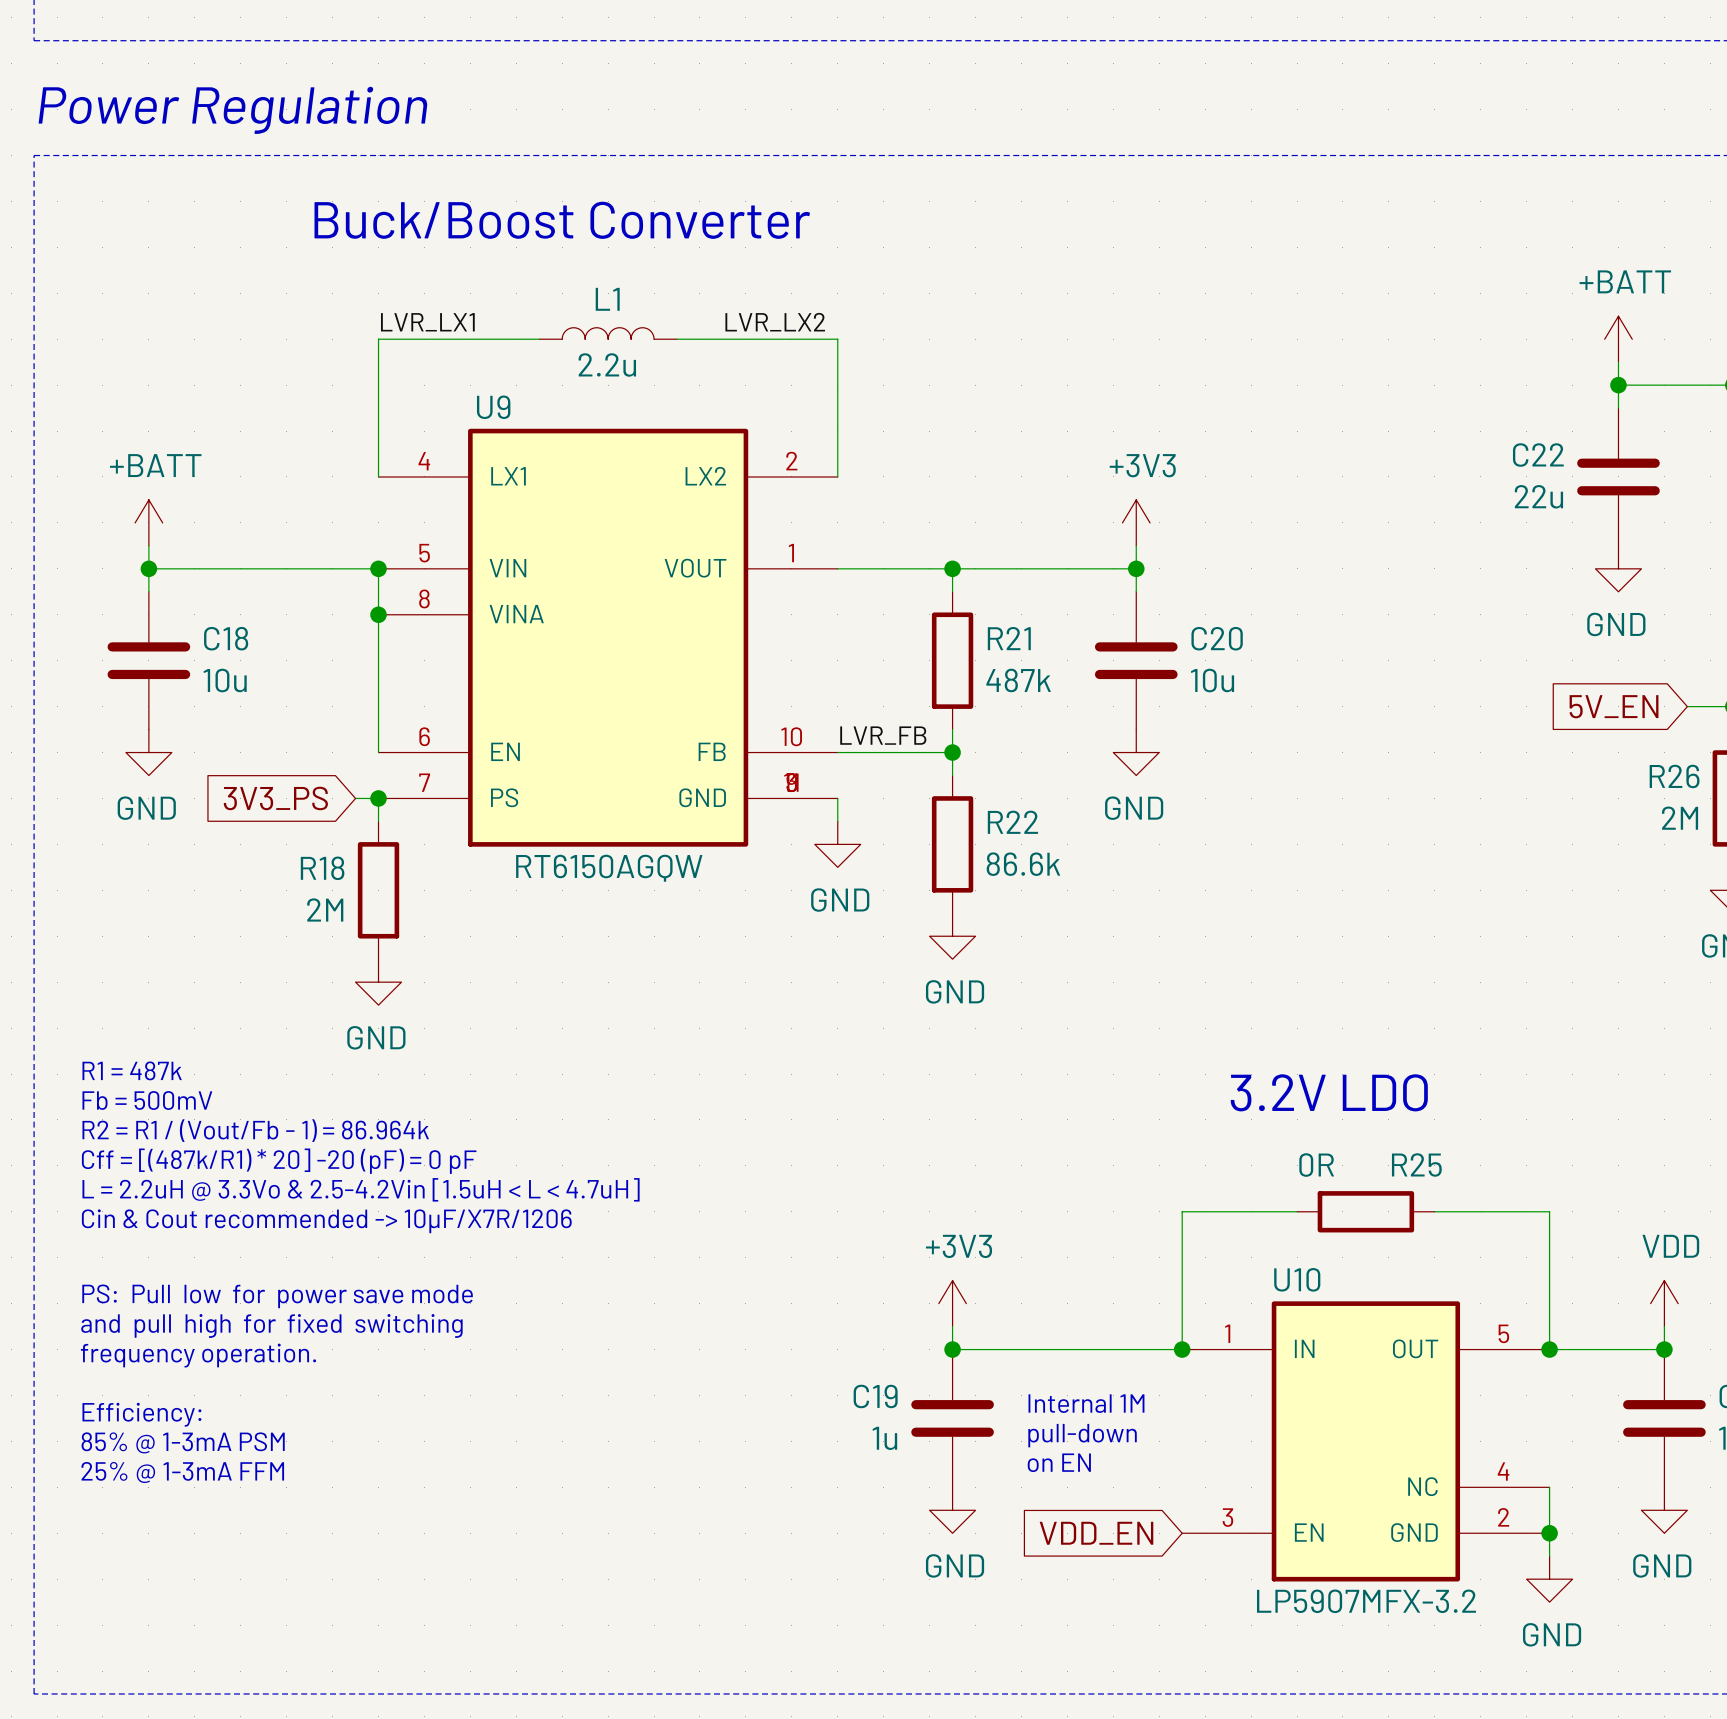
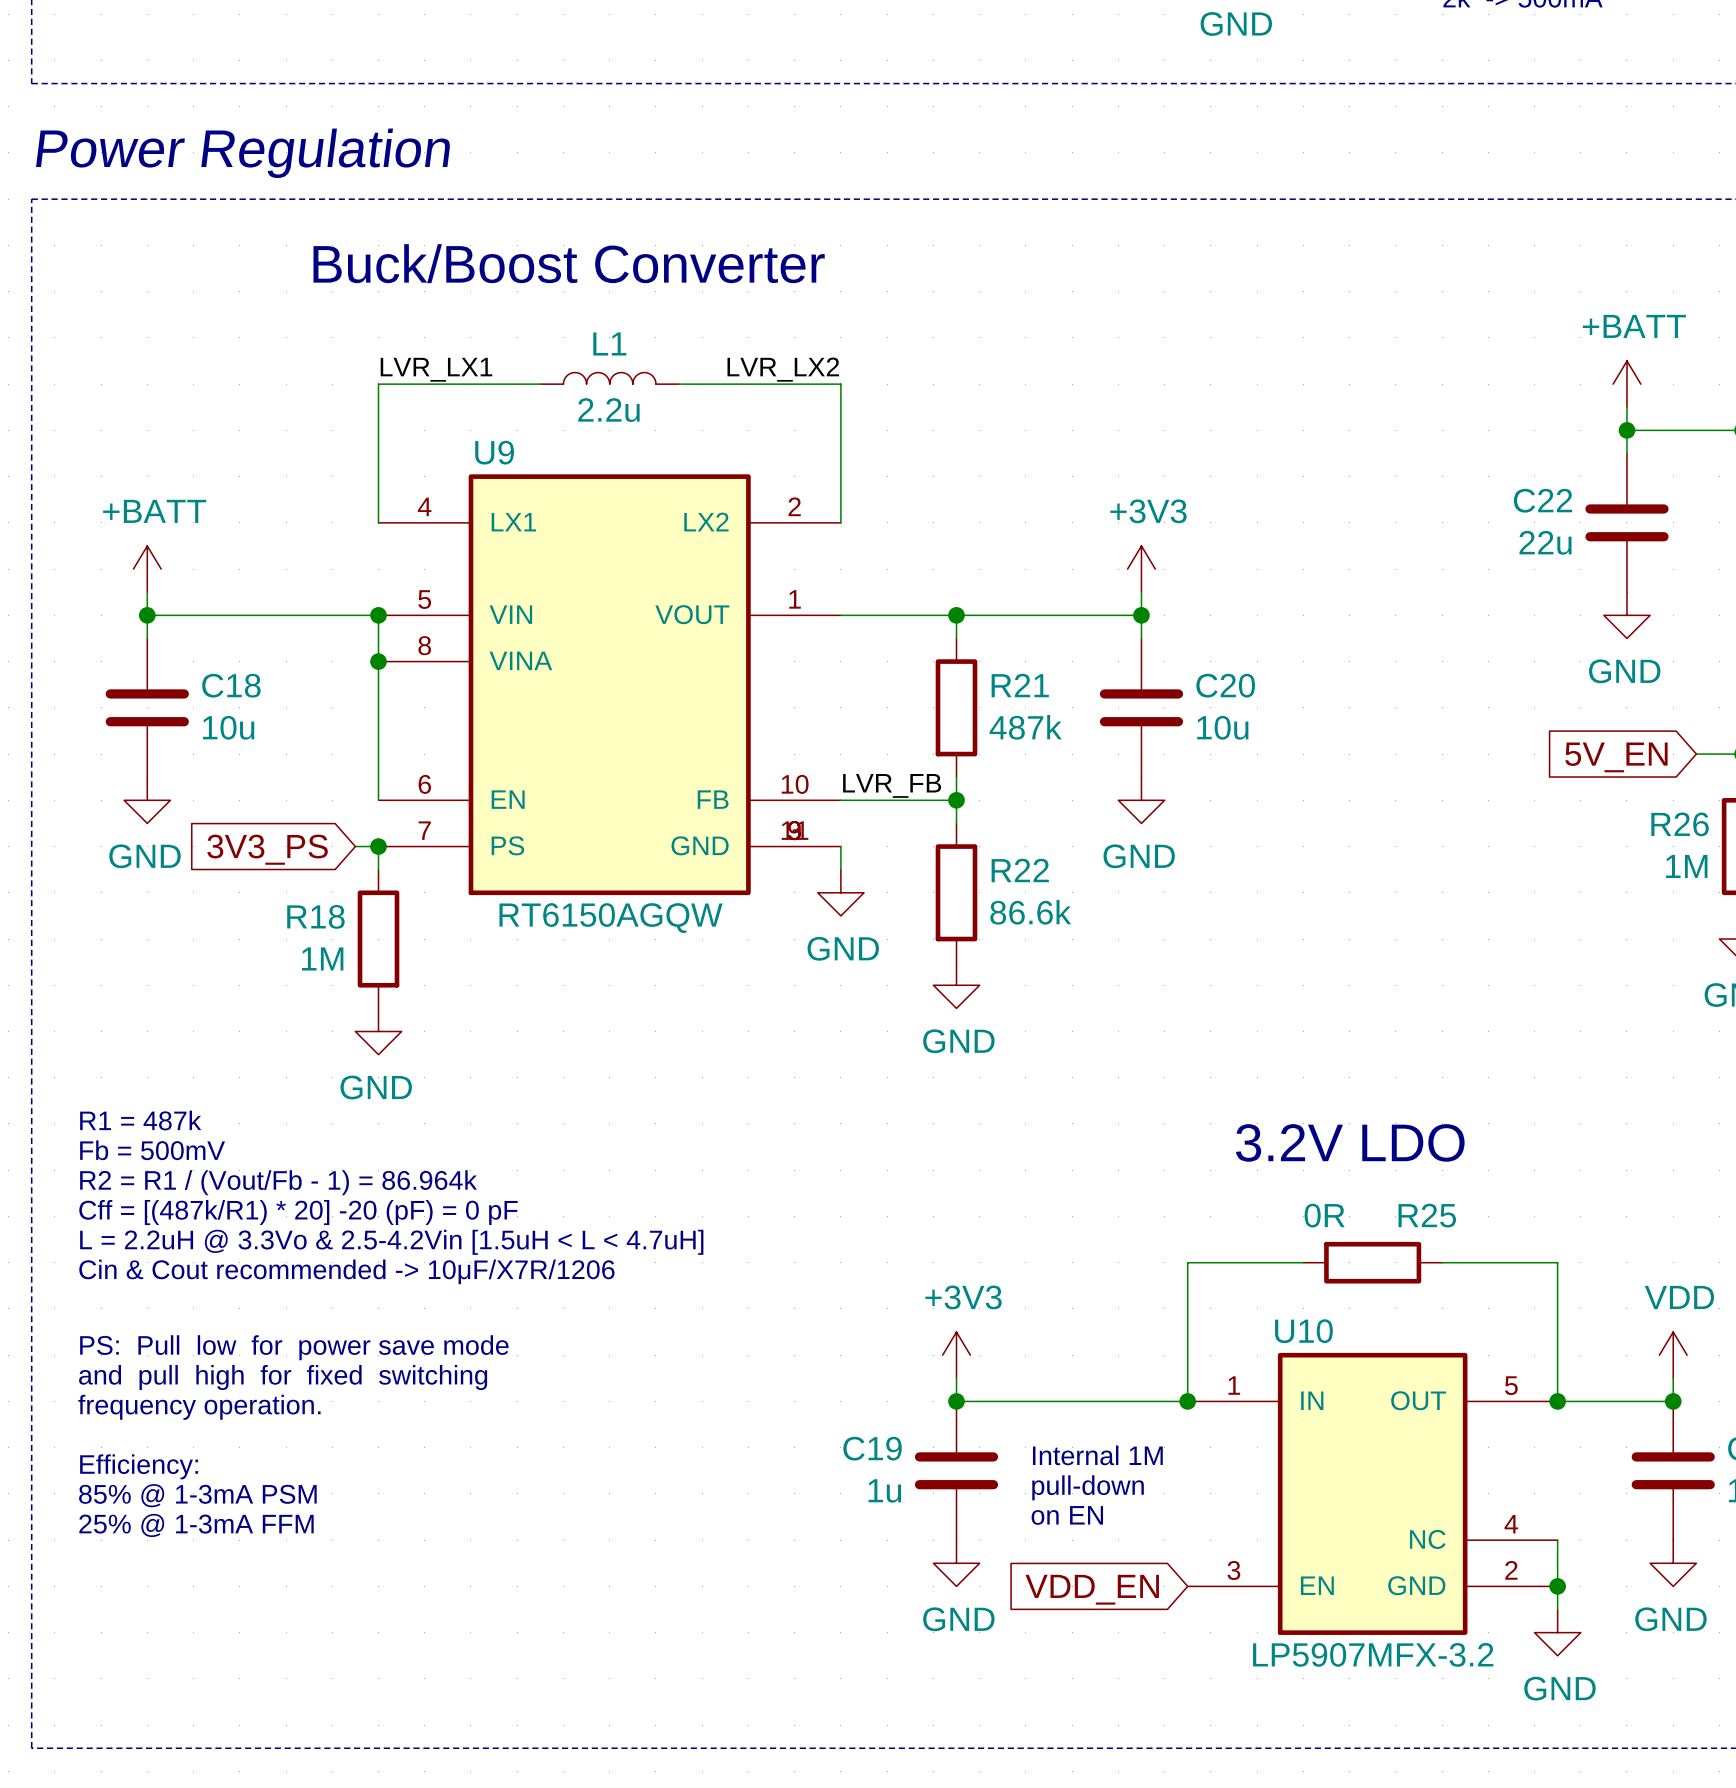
R26 value: 2M (1680, 818) -> 1M (1686, 866)
R18 value: 2M (325, 909) -> 1M (322, 958)

